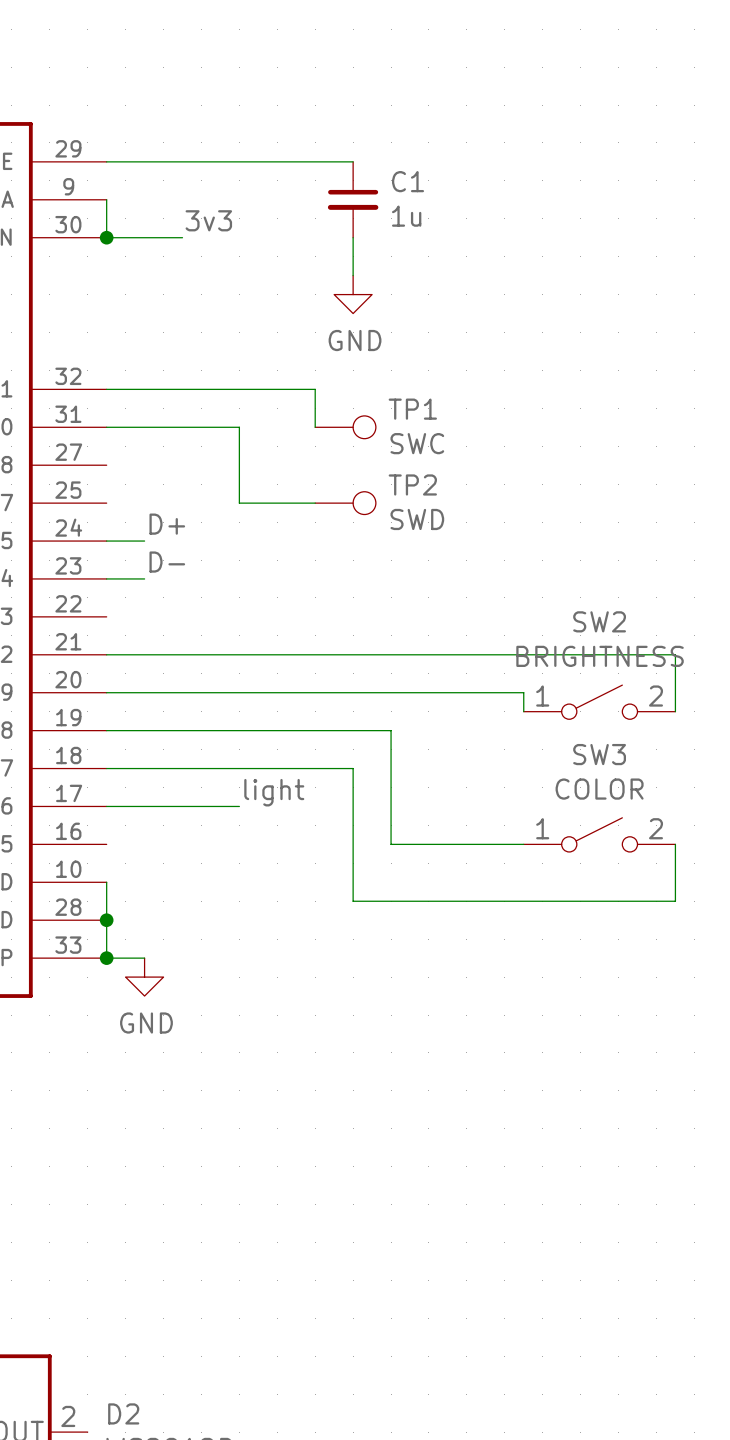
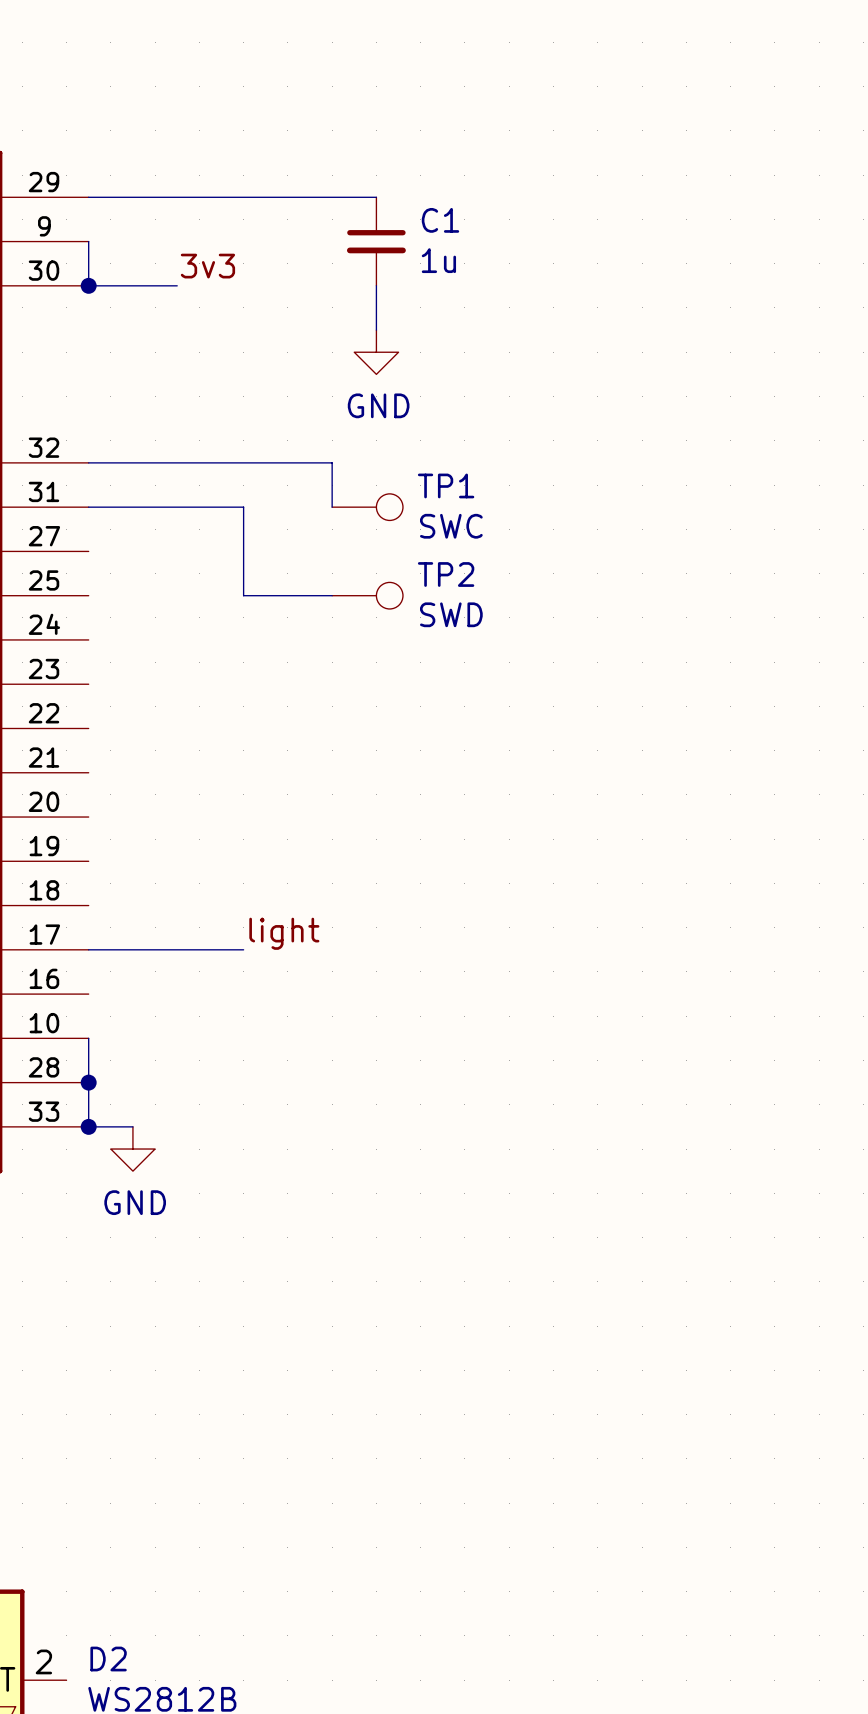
label: D+ (167, 524) -> none
wire: (106, 541) (144, 541) -> none
label: D- (167, 562) -> none
wire: (106, 578) (144, 578) -> none
wire: (106, 654) (675, 654) (675, 711) -> none
wire: (106, 692) (523, 692) (523, 711) -> none
SW2: BRIGHTNESS (599, 702) -> none
wire: (106, 730) (391, 730) (391, 844) (523, 844) -> none
wire: (106, 768) (353, 768) (353, 901) (675, 901) (675, 844) -> none
SW3: COLOR (599, 834) -> none

